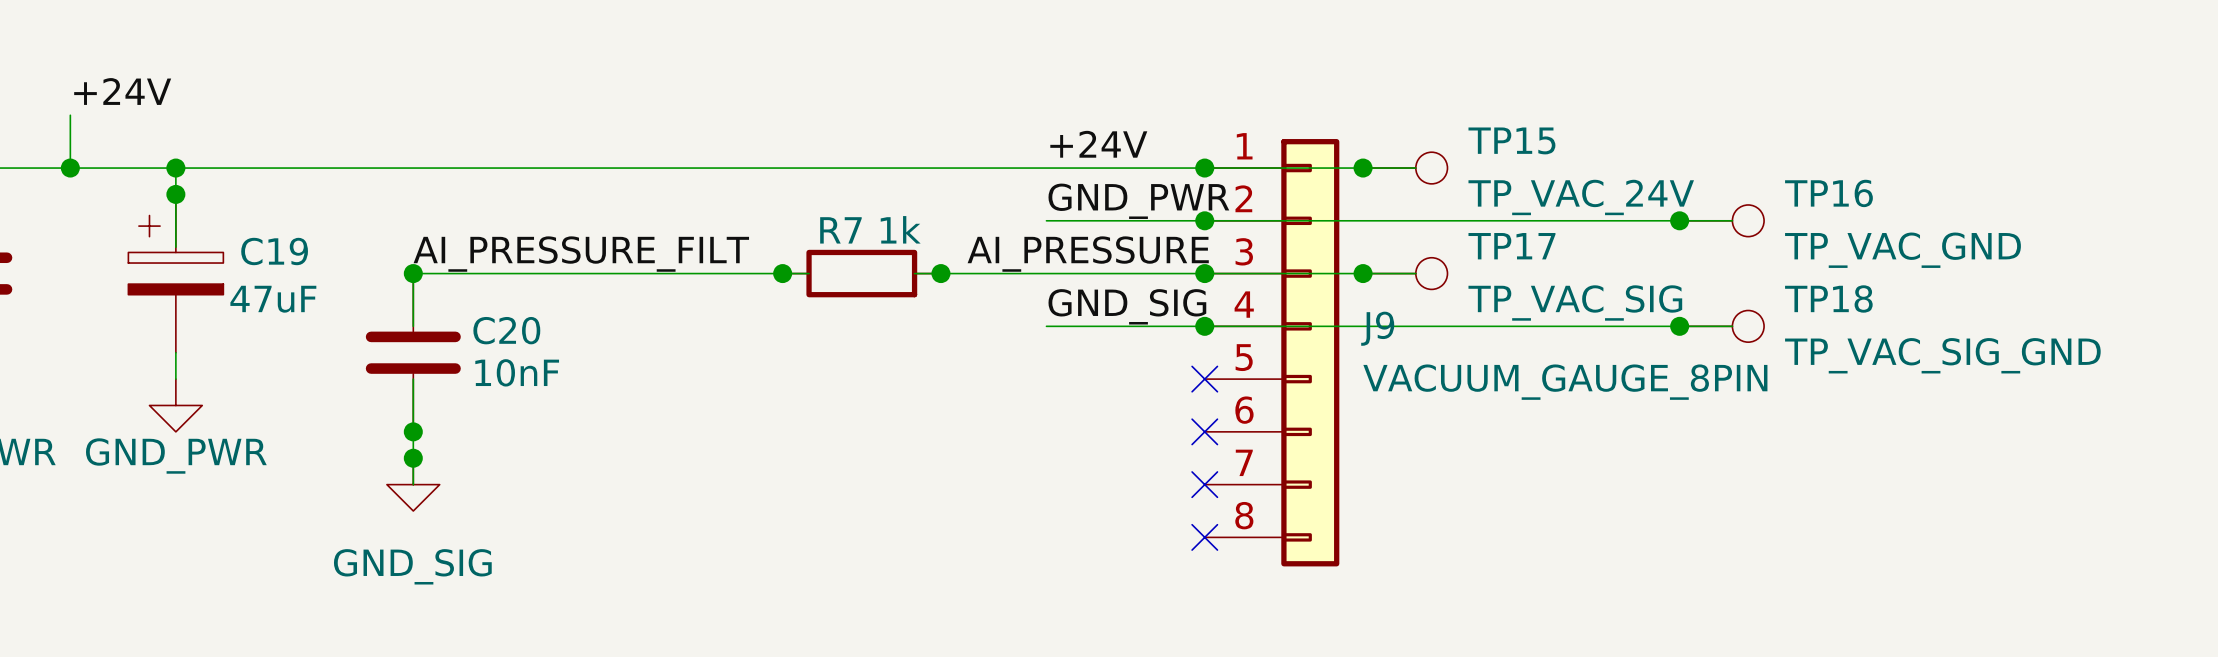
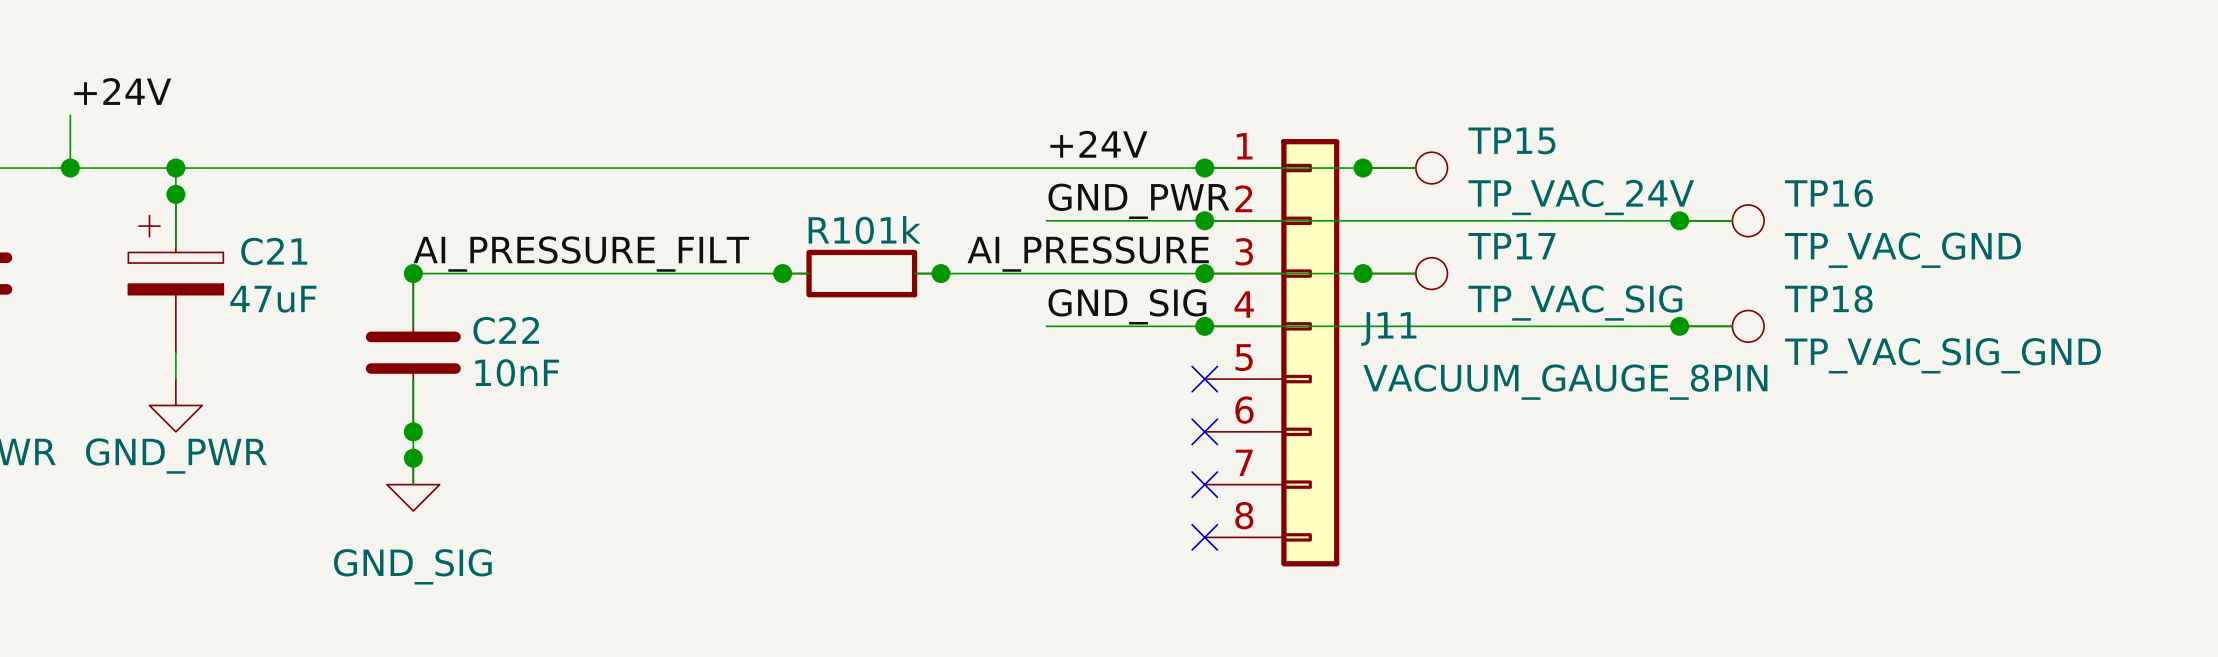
R7 name: R7 (840, 230) -> R10 (841, 230)
C19 name: C19 (274, 251) -> C21 (274, 251)
J9 name: J9 (1377, 328) -> J11 (1388, 328)
C20 name: C20 (506, 330) -> C22 (506, 330)

